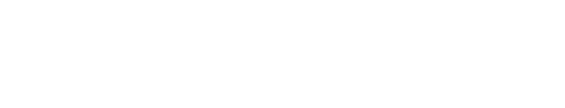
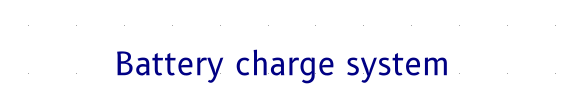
text: none -> Battery charge system (281, 66)

